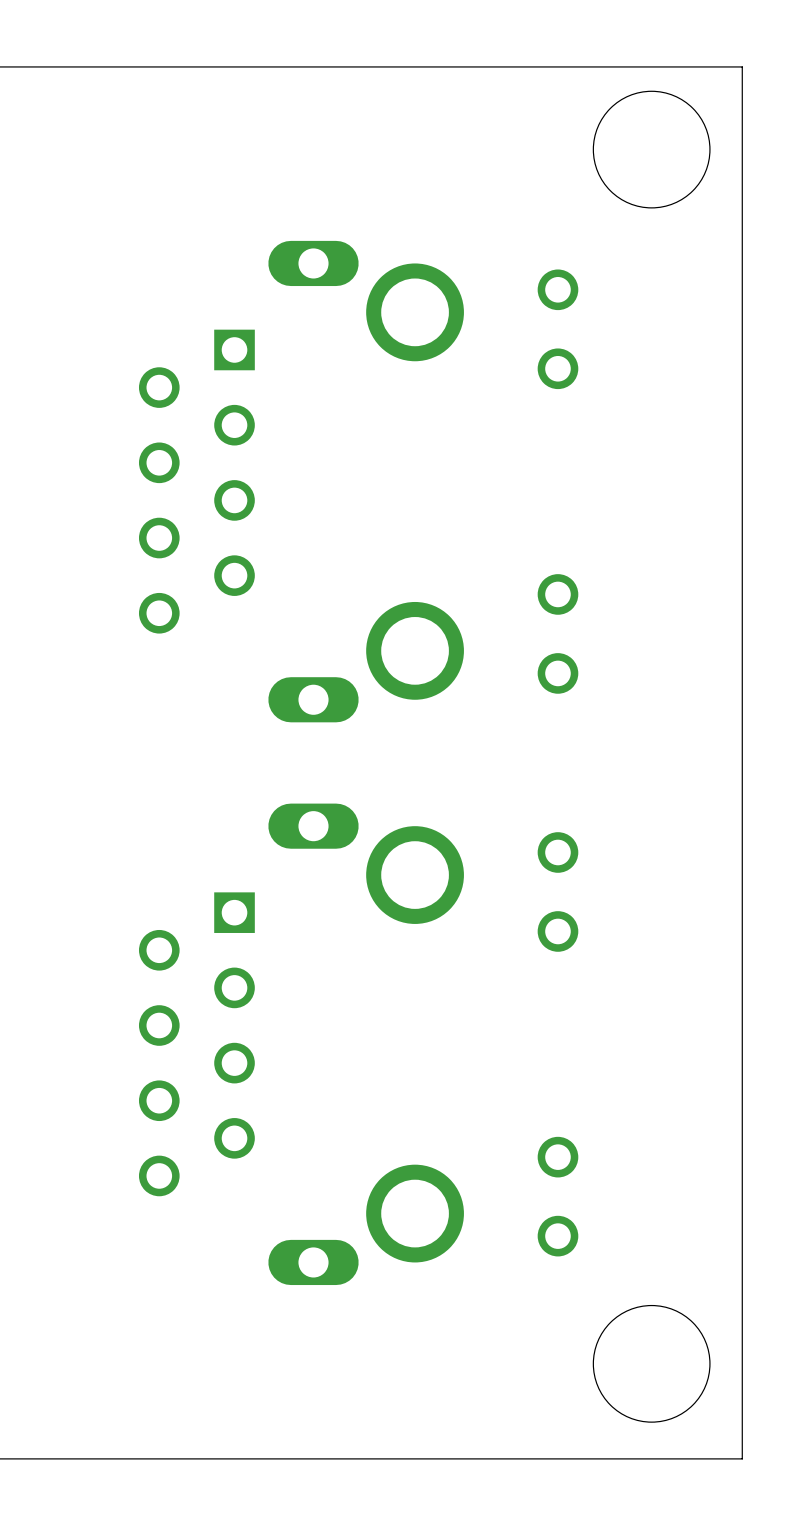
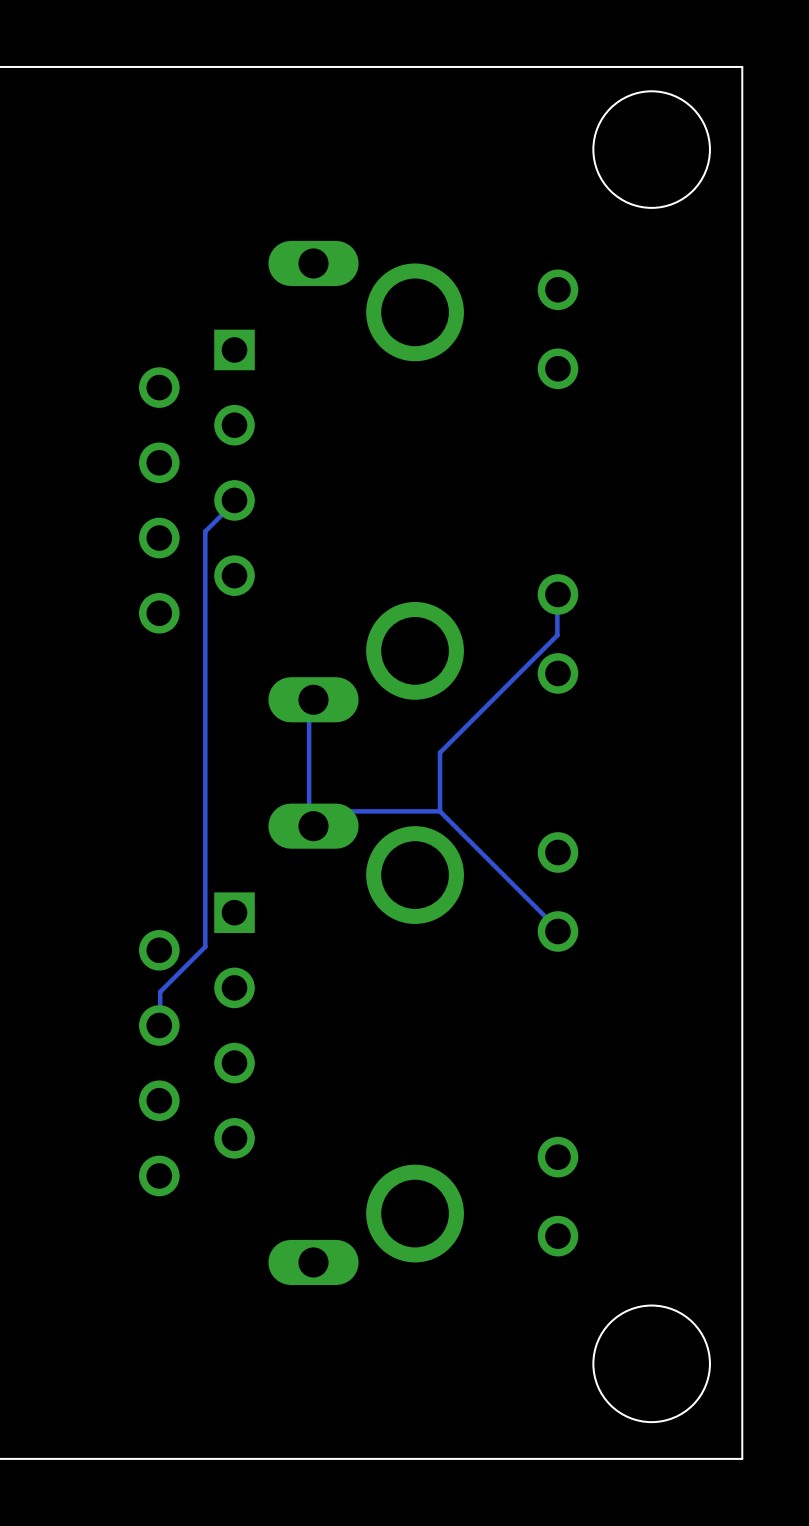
track: none -> (234, 500) (205, 531) (205, 946) (160, 991) (159, 1025)
track: none -> (557, 594) (557, 635) (440, 752) (440, 811)
track: none -> (313, 699) (309, 703) (309, 824) (313, 826) (309, 811) (440, 811)
track: none -> (440, 811) (557, 931)

